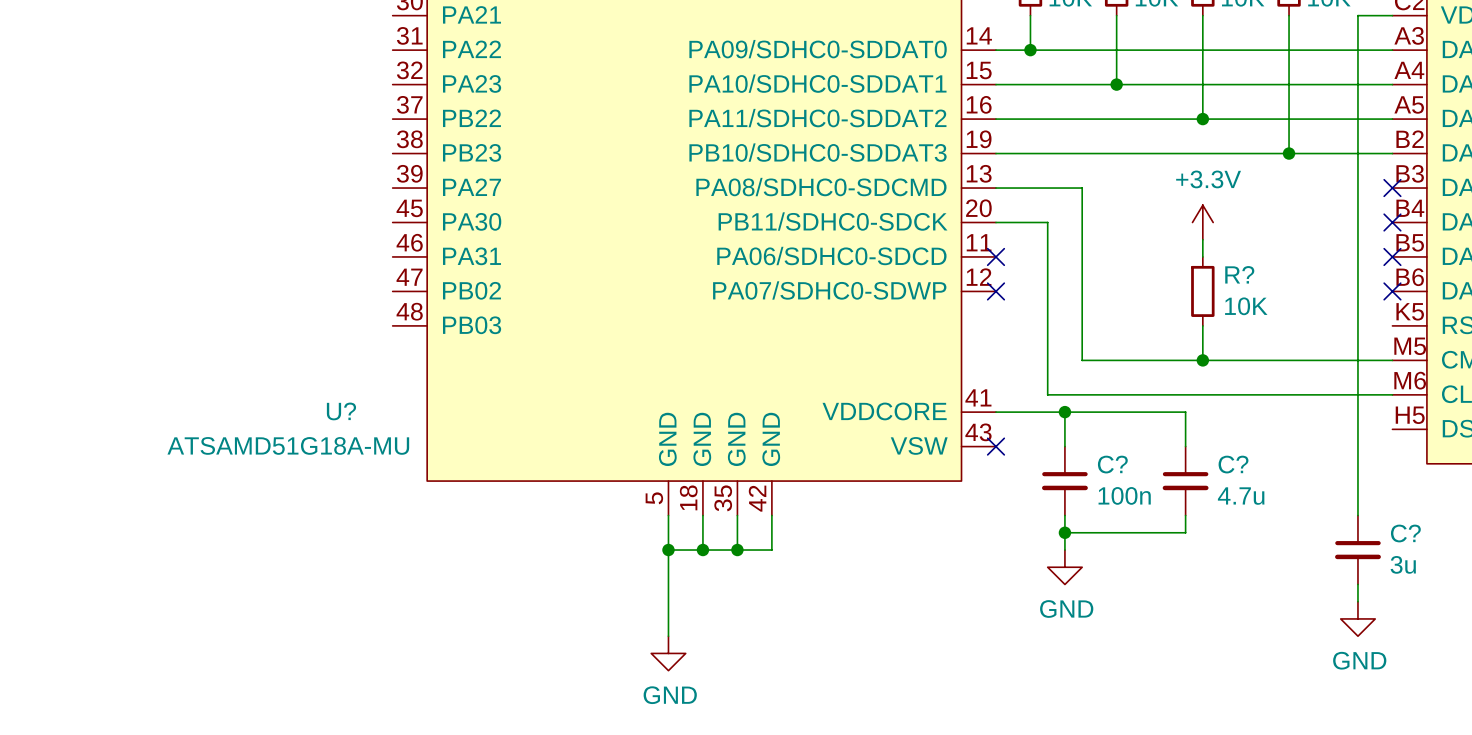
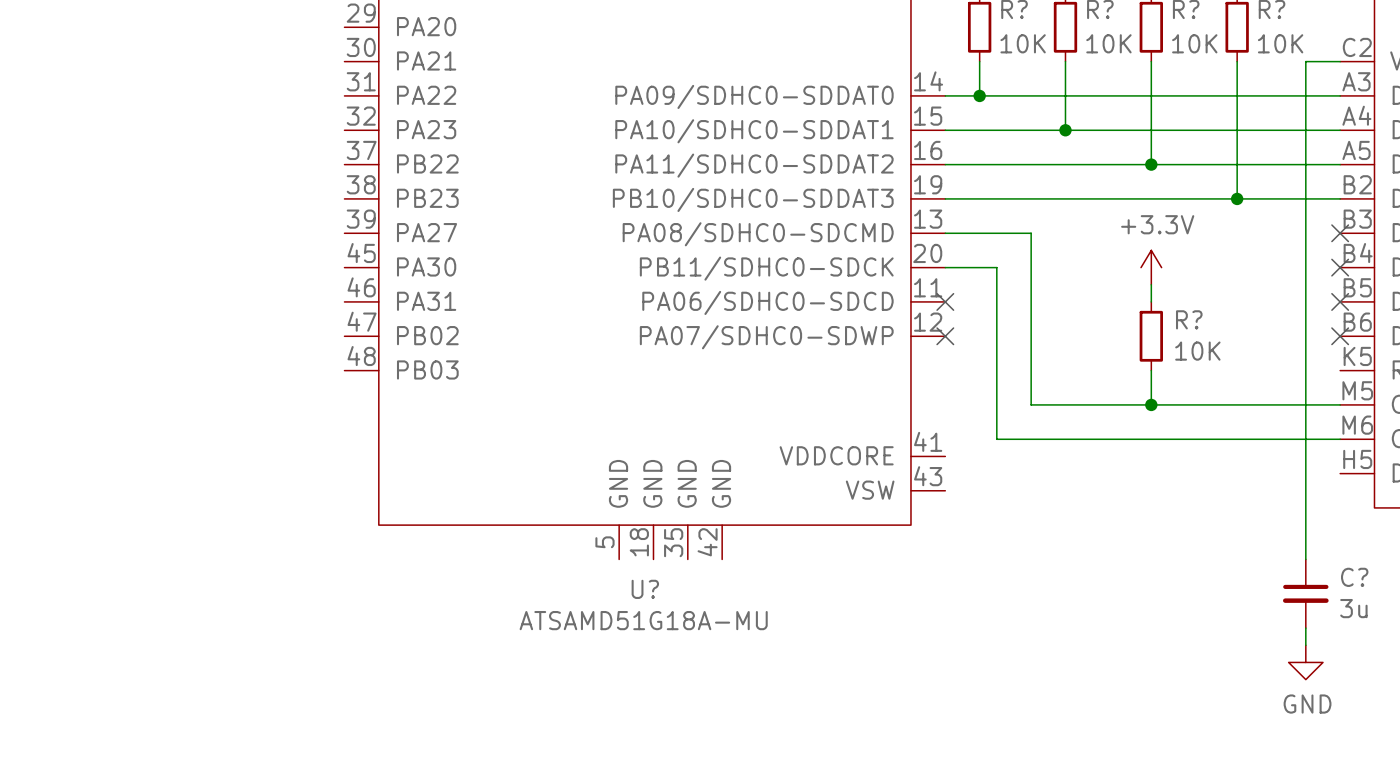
U? name position: U? (341, 411) -> U? (645, 589)
wire: (995, 412) (1185, 412) (1185, 446) -> none
wire: (1064, 412) (1064, 446) -> none
junction: (1064, 412) -> none
U? value position: ATSAMD51G18A-MU (288, 445) -> ATSAMD51G18A-MU (643, 620)
no-connect mark: (995, 446) -> none
C?: 100n (1064, 481) -> none
C?: 4.7u (1185, 481) -> none
wire: (668, 515) (668, 636) -> none
wire: (702, 515) (702, 550) -> none
wire: (737, 515) (737, 550) -> none
wire: (771, 515) (771, 550) (668, 550) -> none
wire: (1064, 515) (1064, 550) -> none
wire: (1185, 515) (1185, 532) (1064, 532) -> none
junction: (1064, 532) -> none
junction: (668, 550) -> none
junction: (702, 550) -> none
junction: (737, 550) -> none
power symbol: GND (1064, 567) -> none
power symbol: GND (668, 653) -> none

